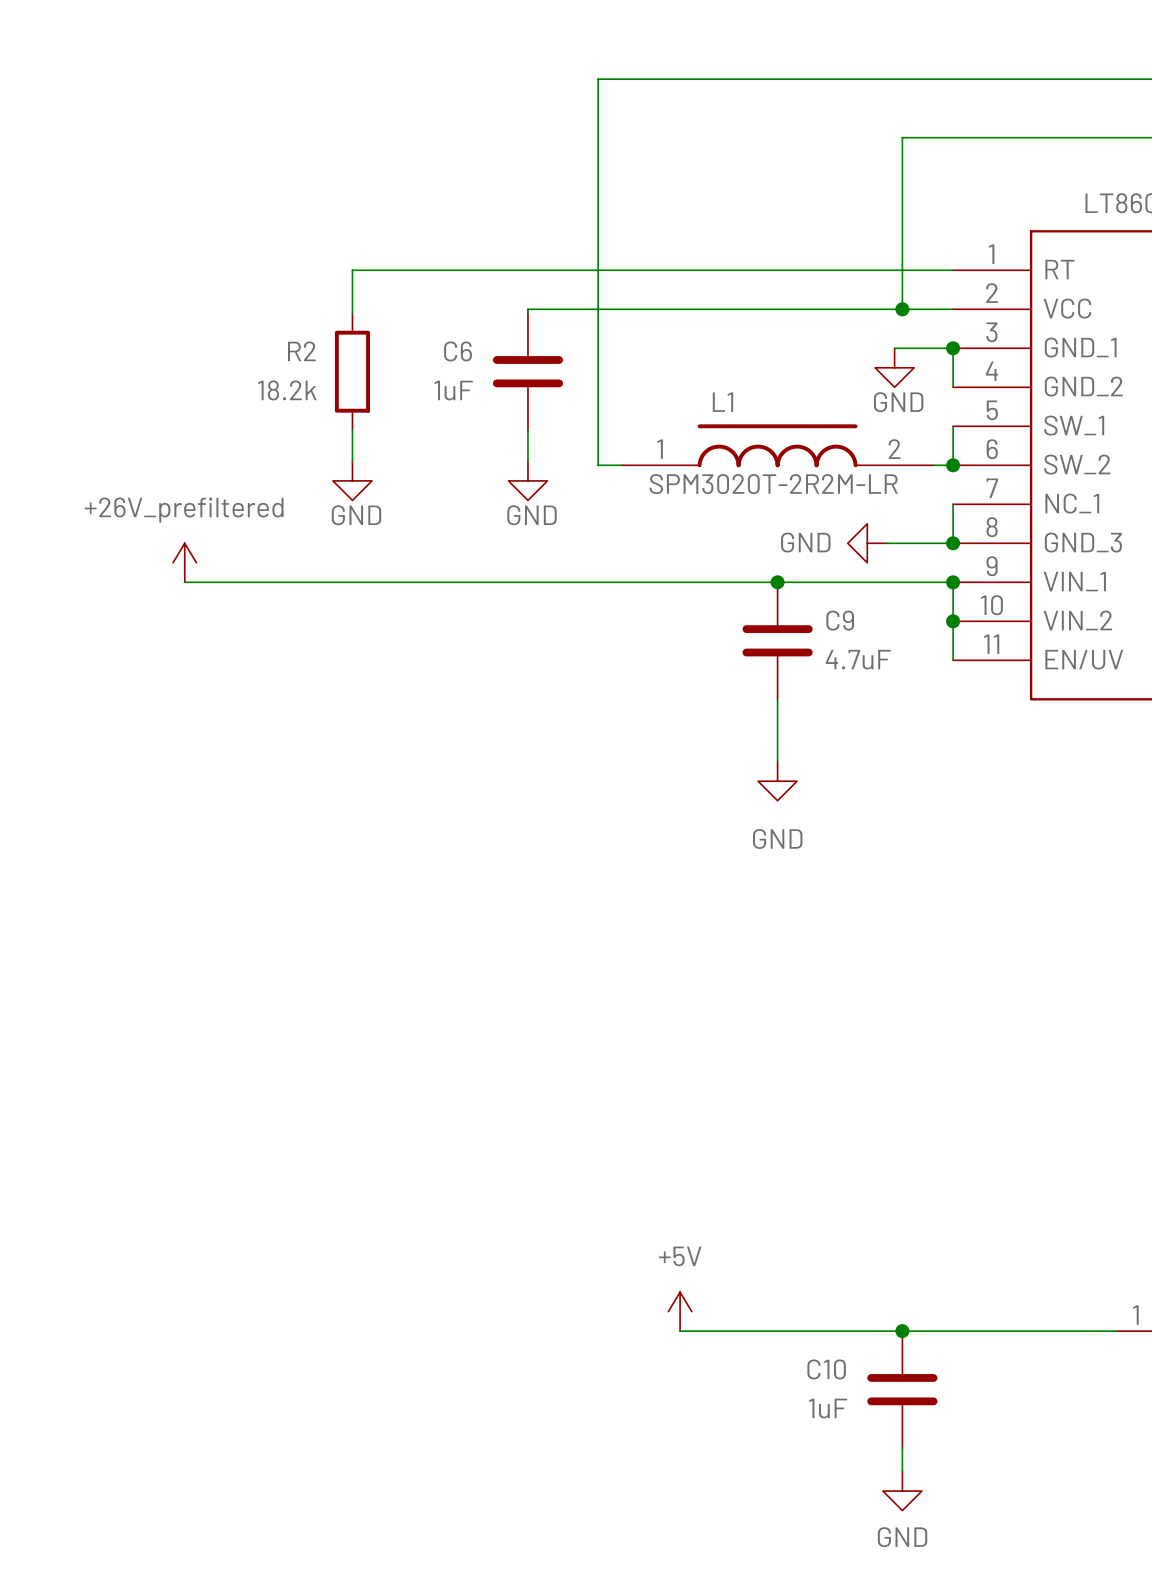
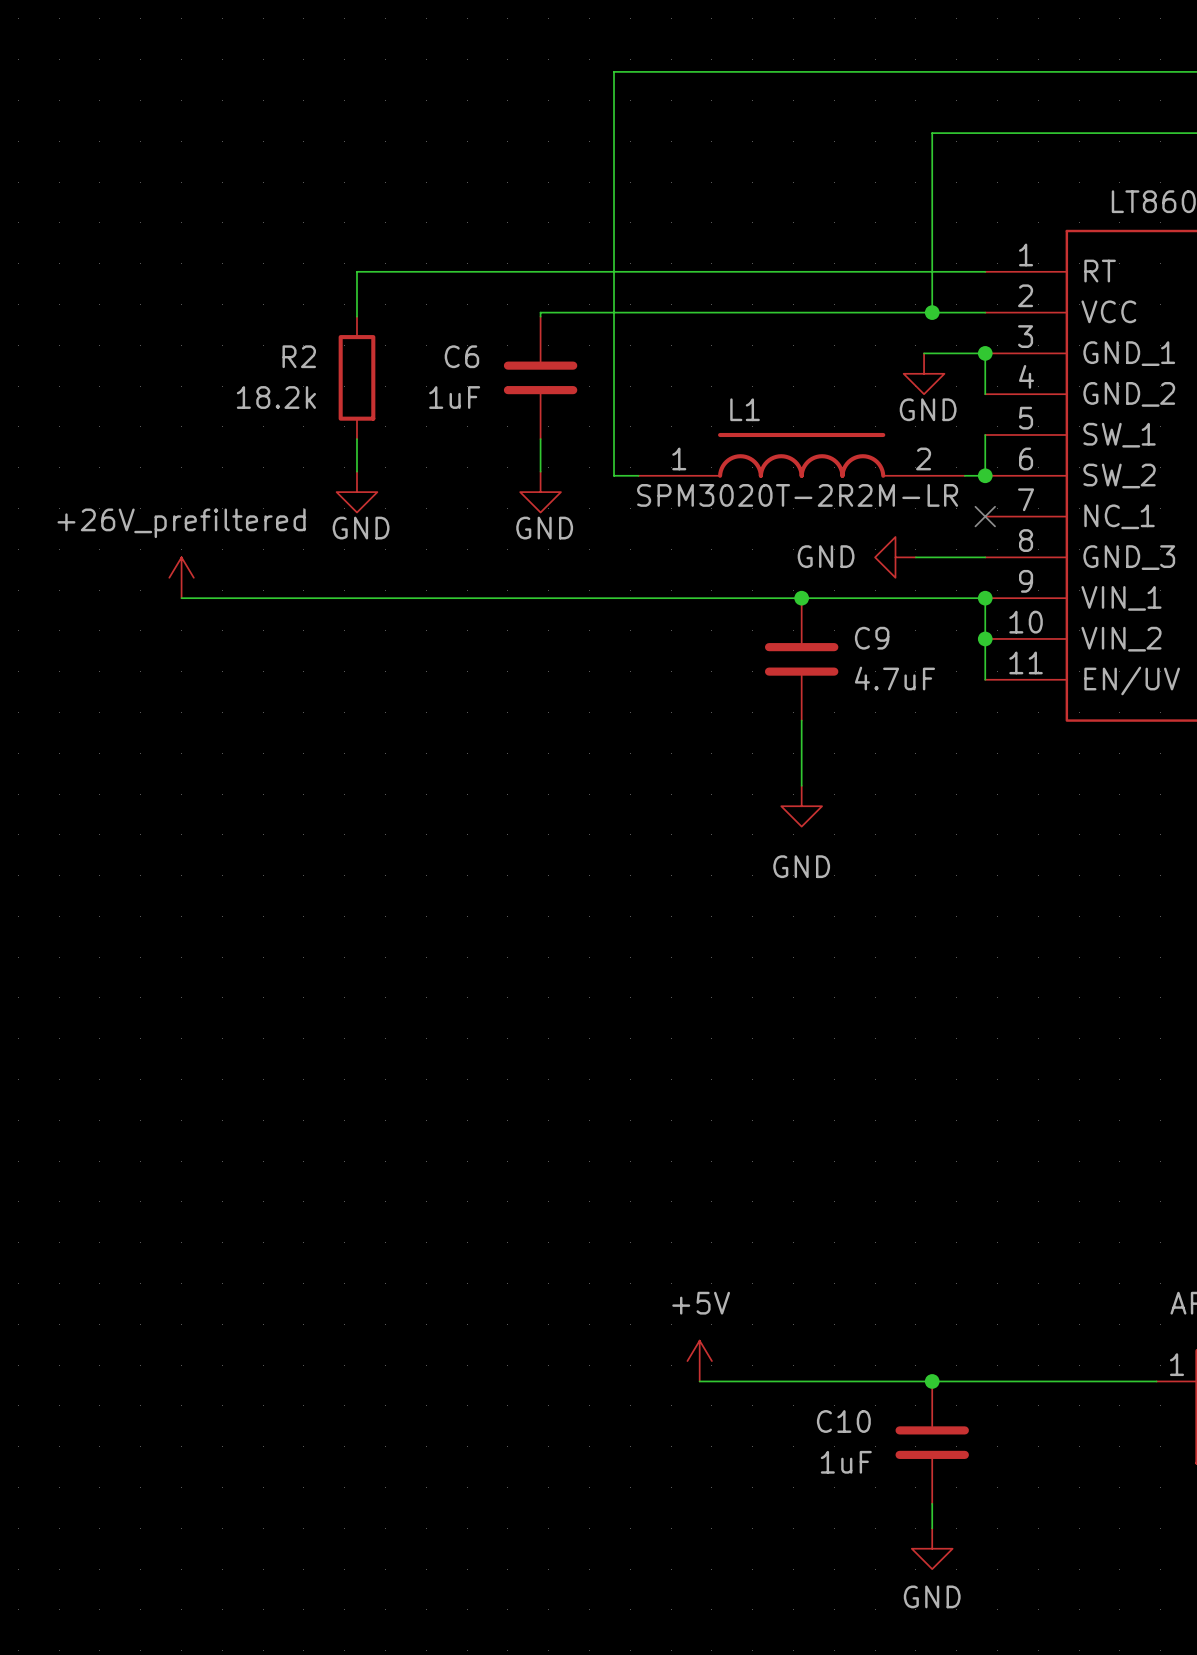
wire: (953, 504) (953, 543) -> none
no-connect mark: none -> (985, 516)
junction: (953, 543) -> none

